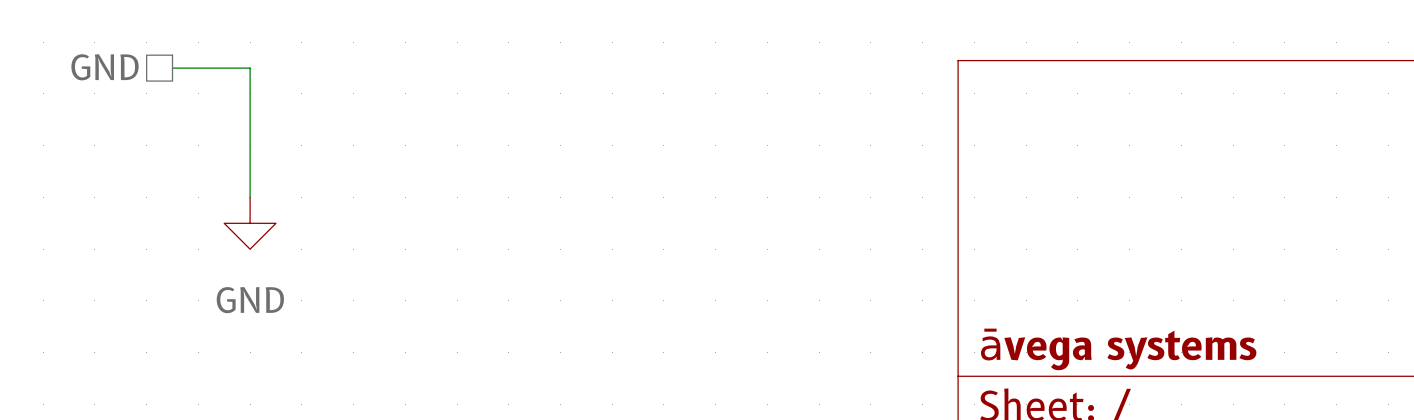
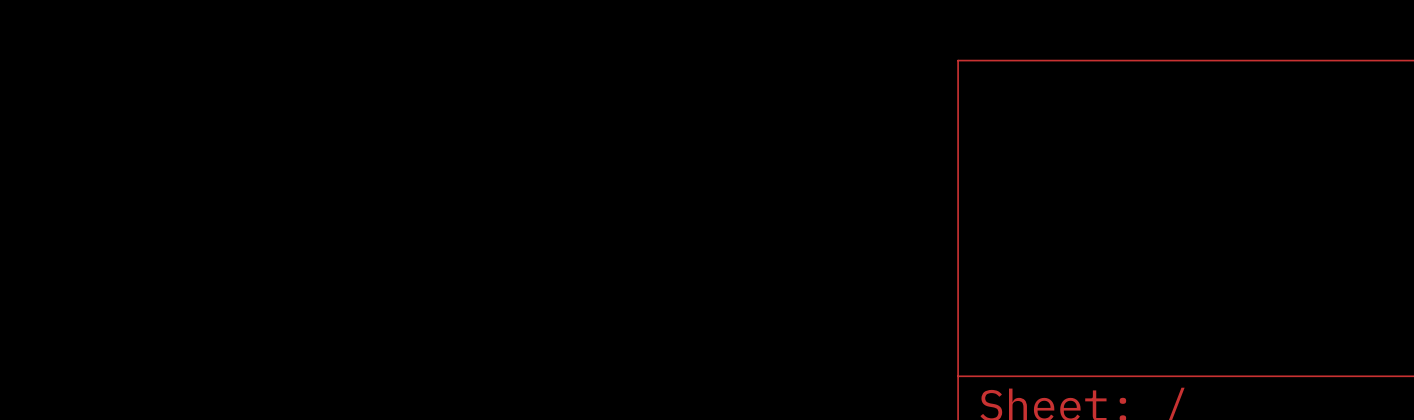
hierarchical label: GND (104, 67) -> none
wire: (172, 68) (250, 68) (250, 197) -> none
power symbol: GND (250, 223) -> none
title block: āvega systems (1118, 349) -> none

